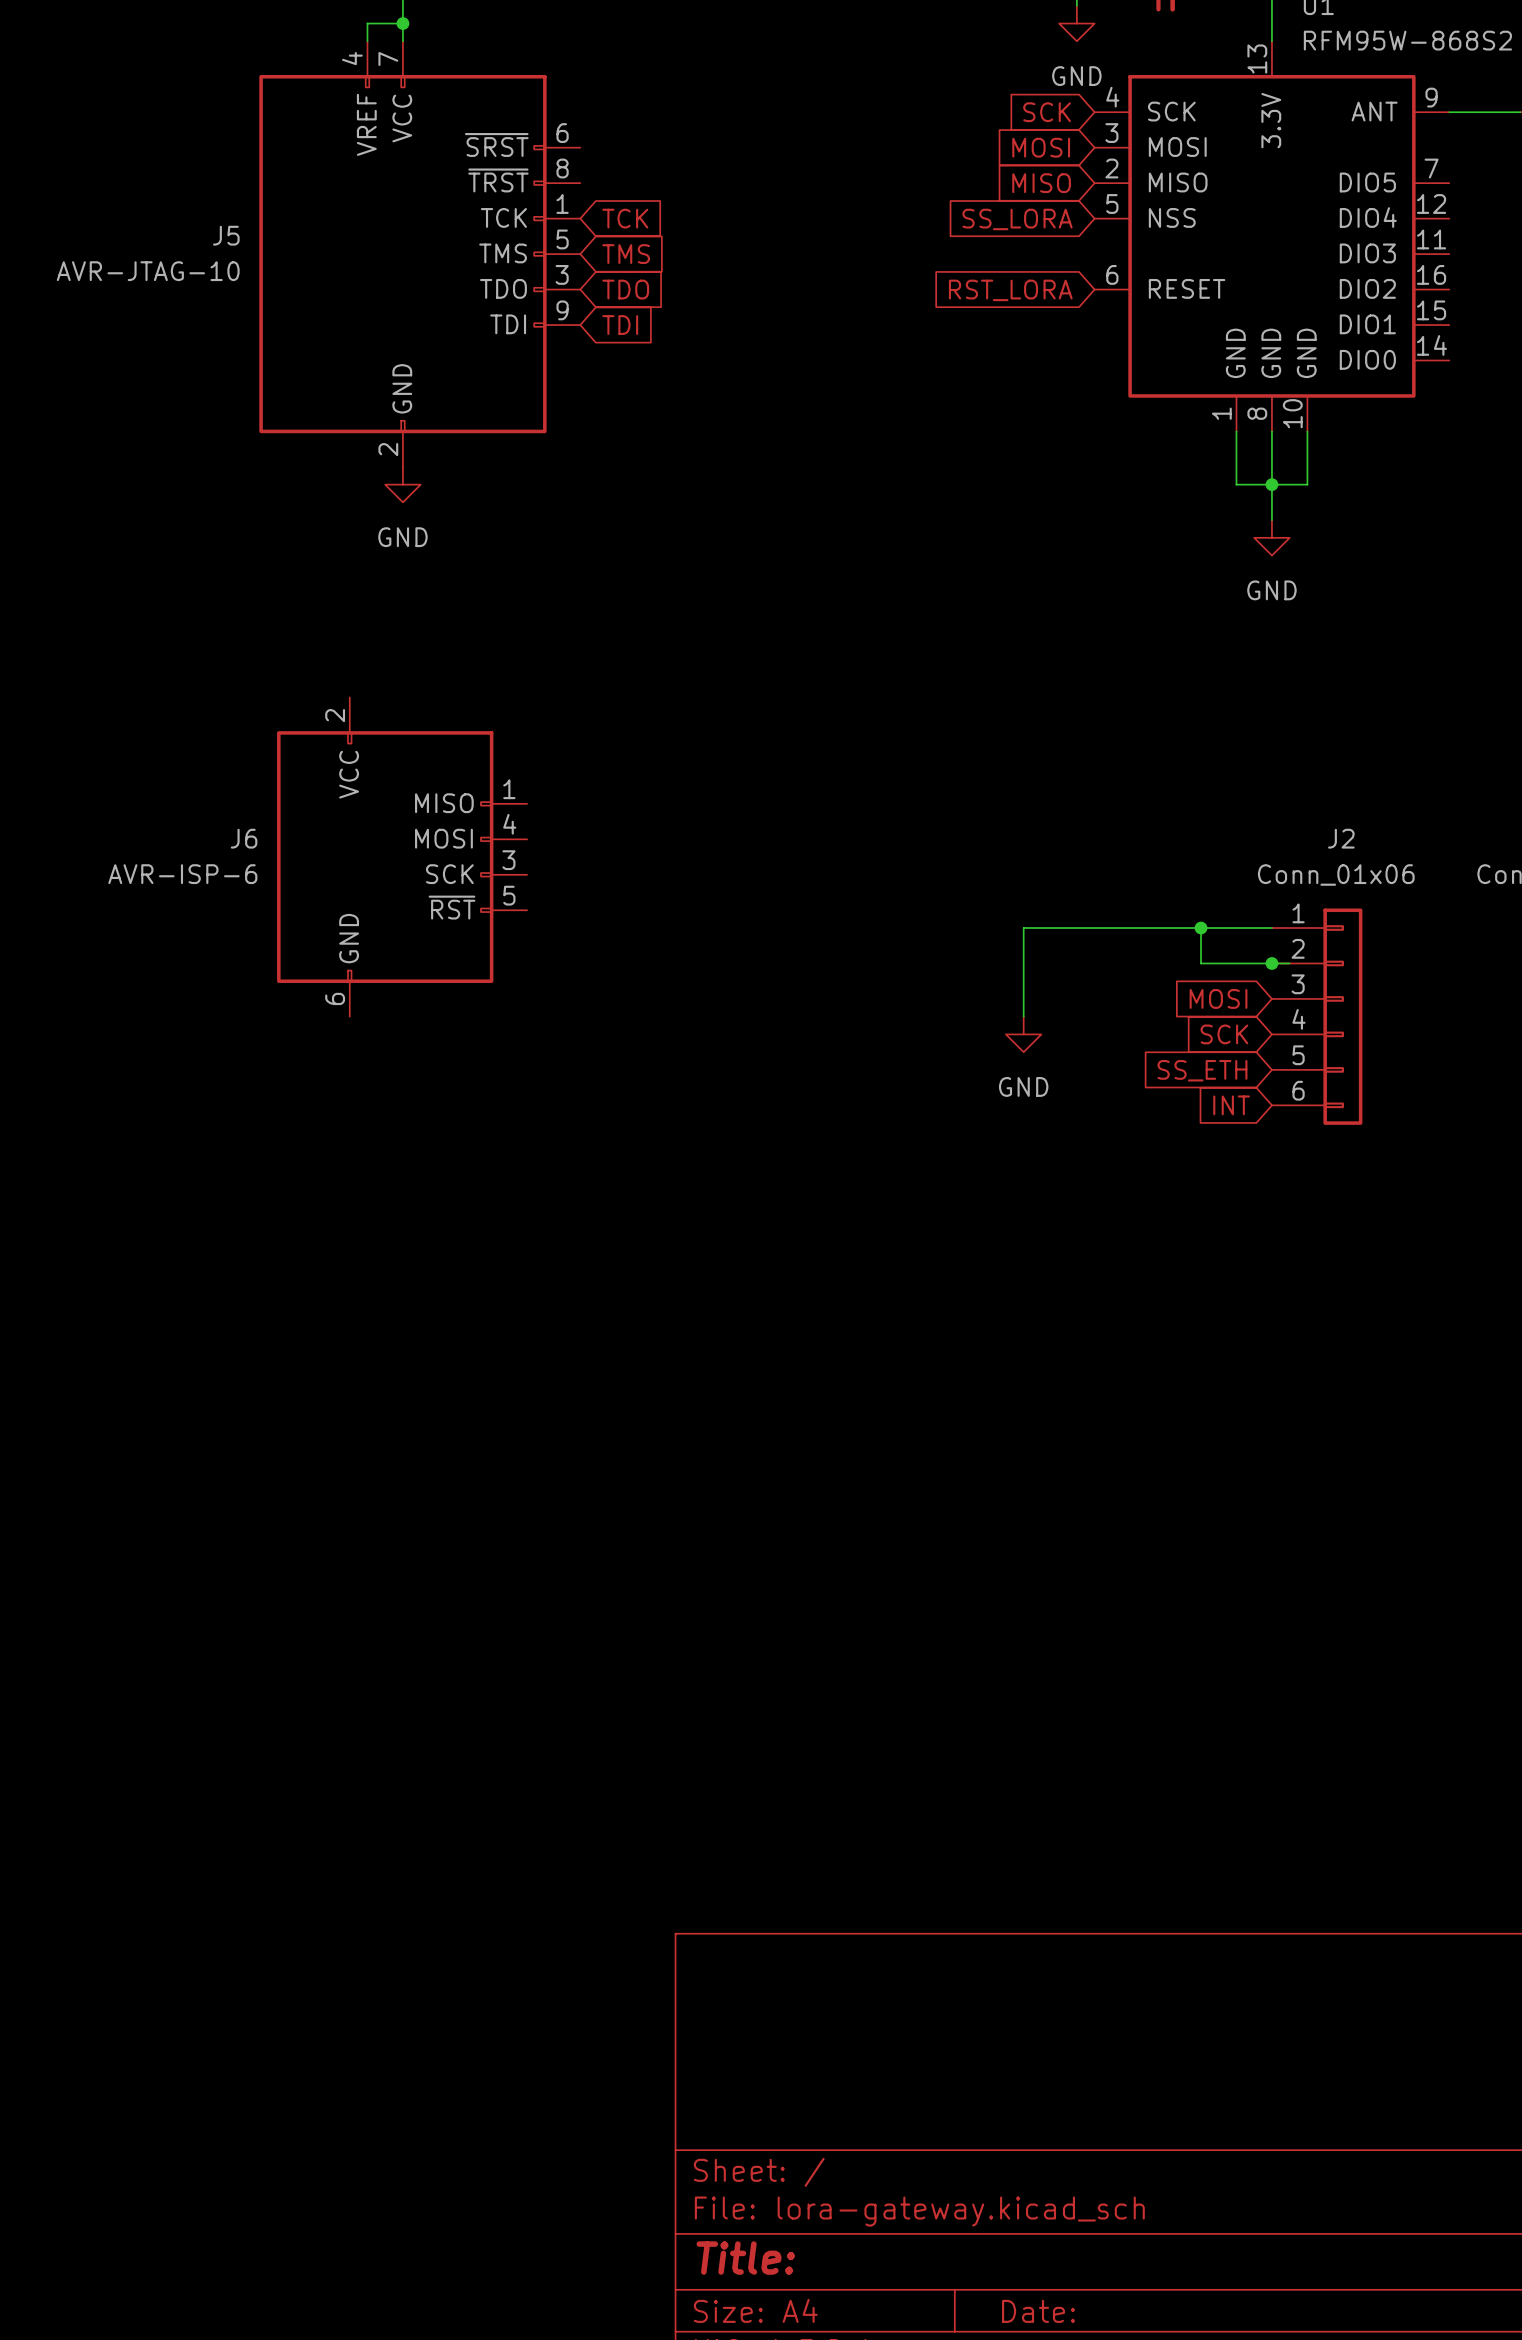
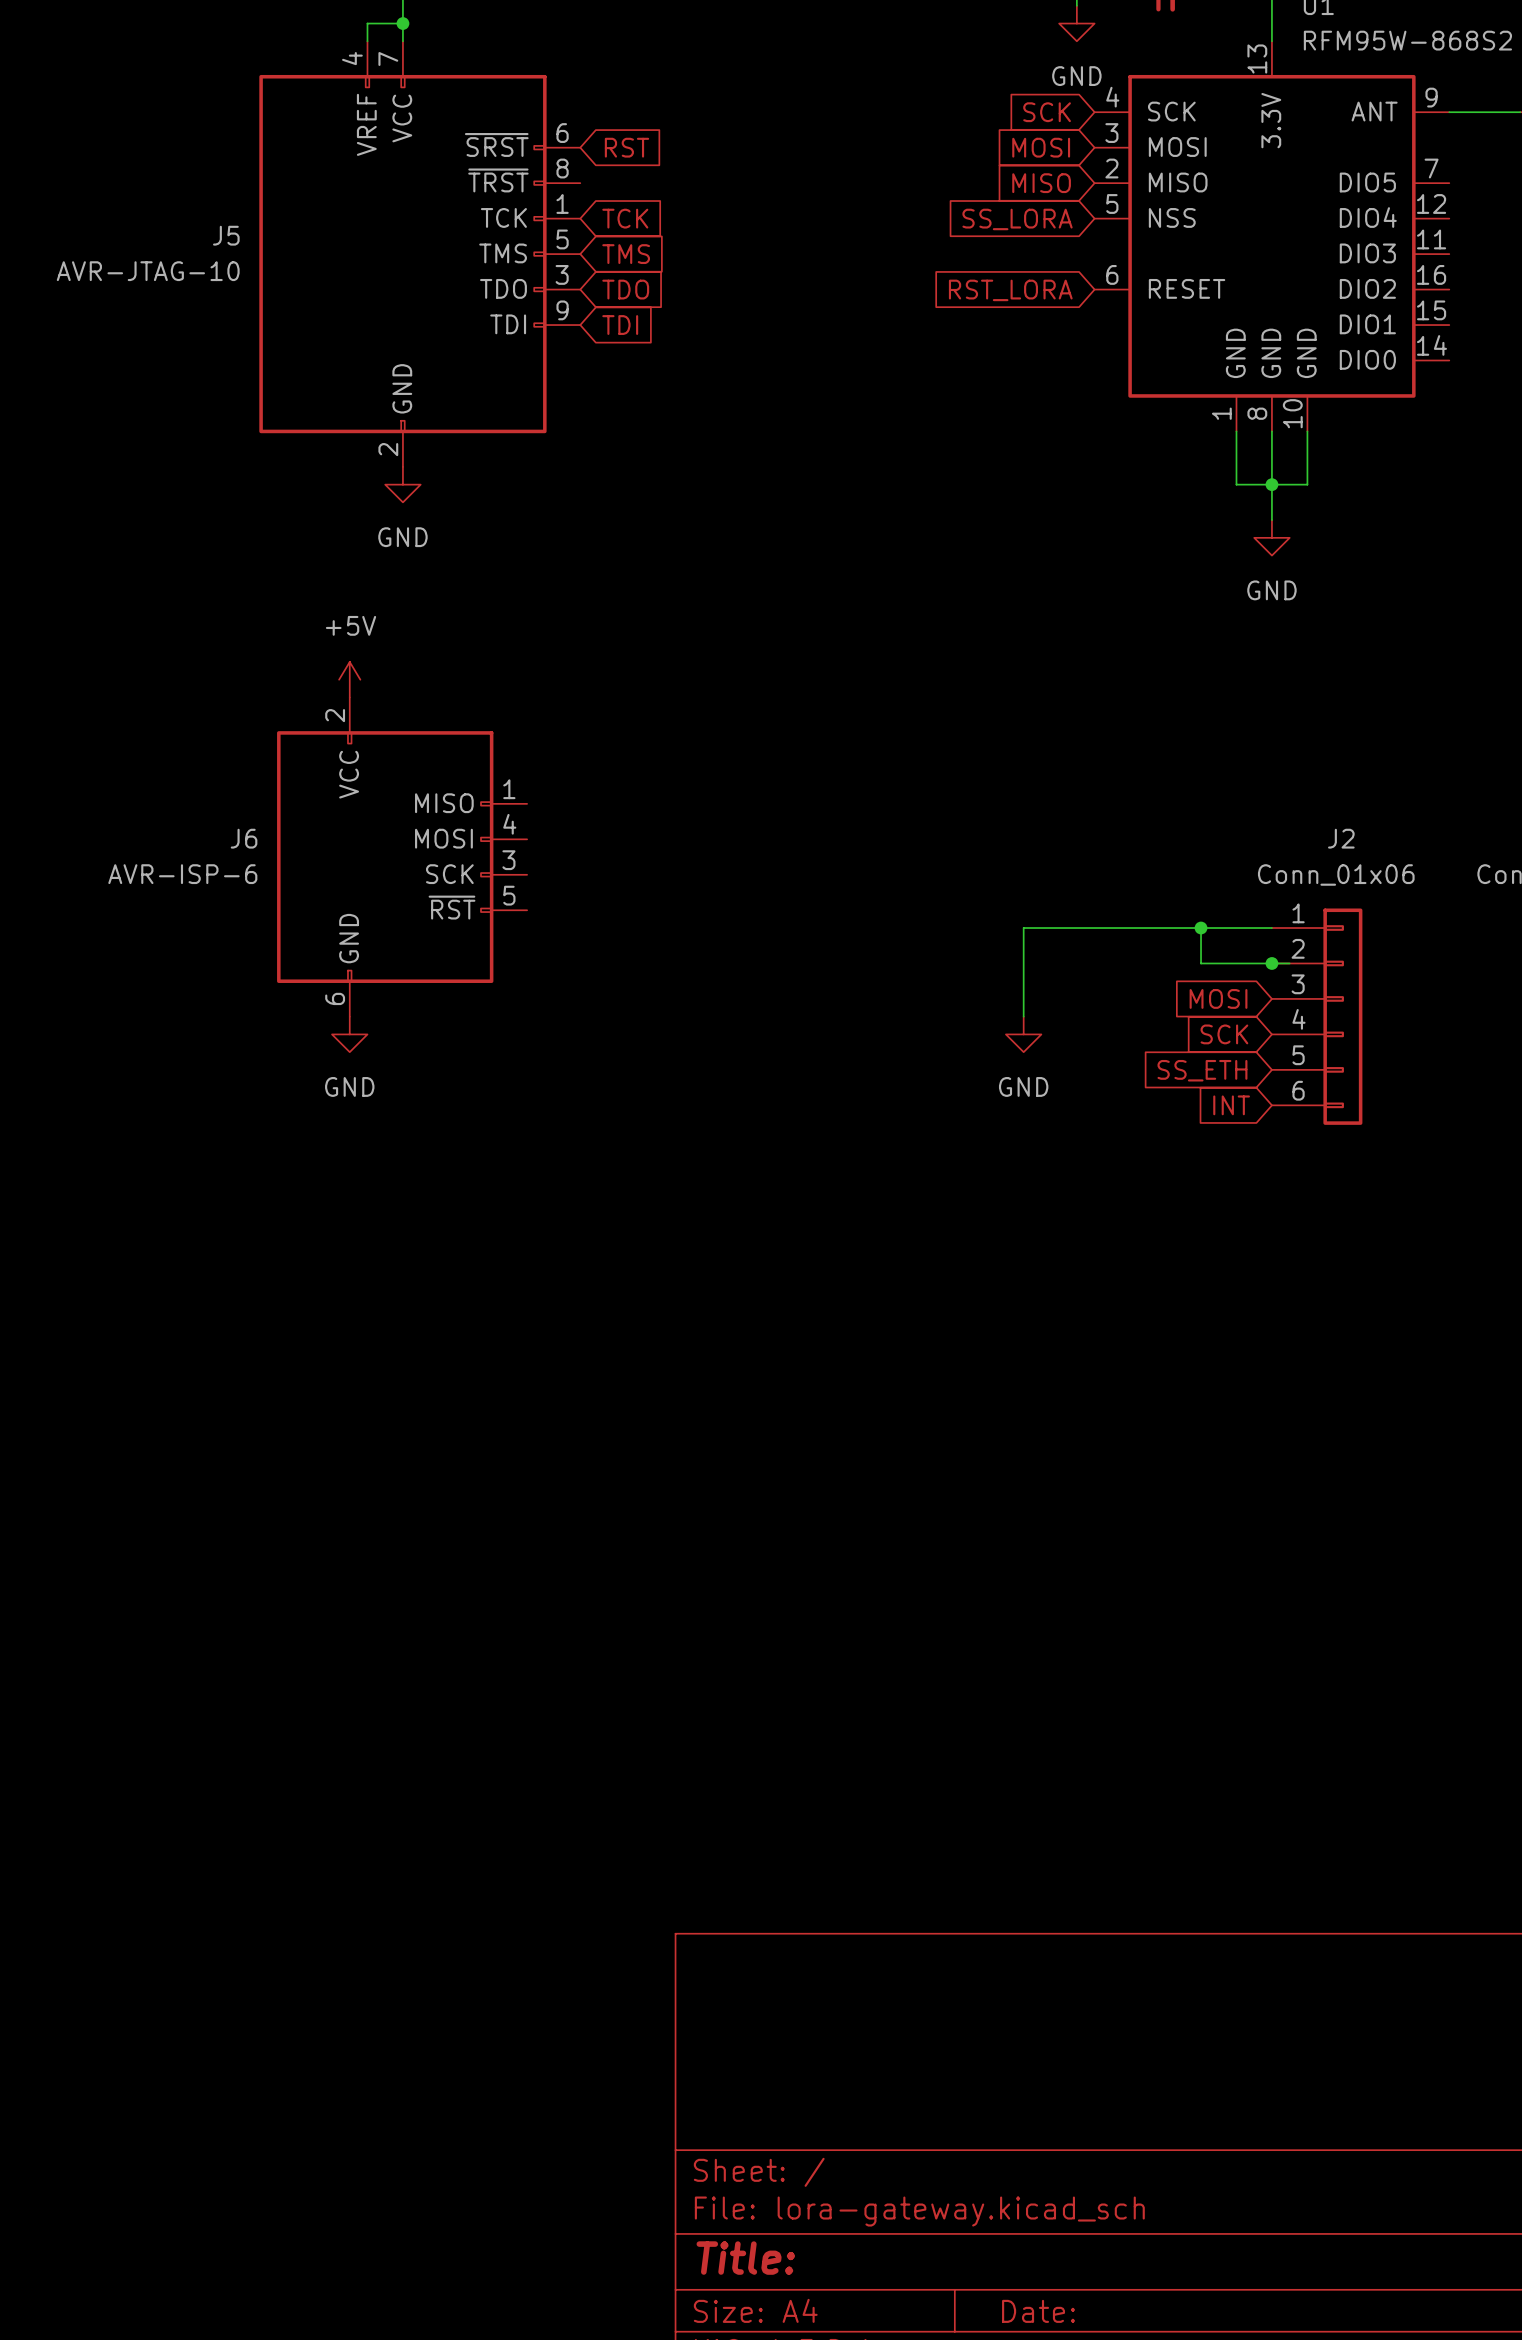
global label: none -> RST (626, 147)
power symbol: none -> +5V (349, 679)
power symbol: none -> GND (349, 1034)

